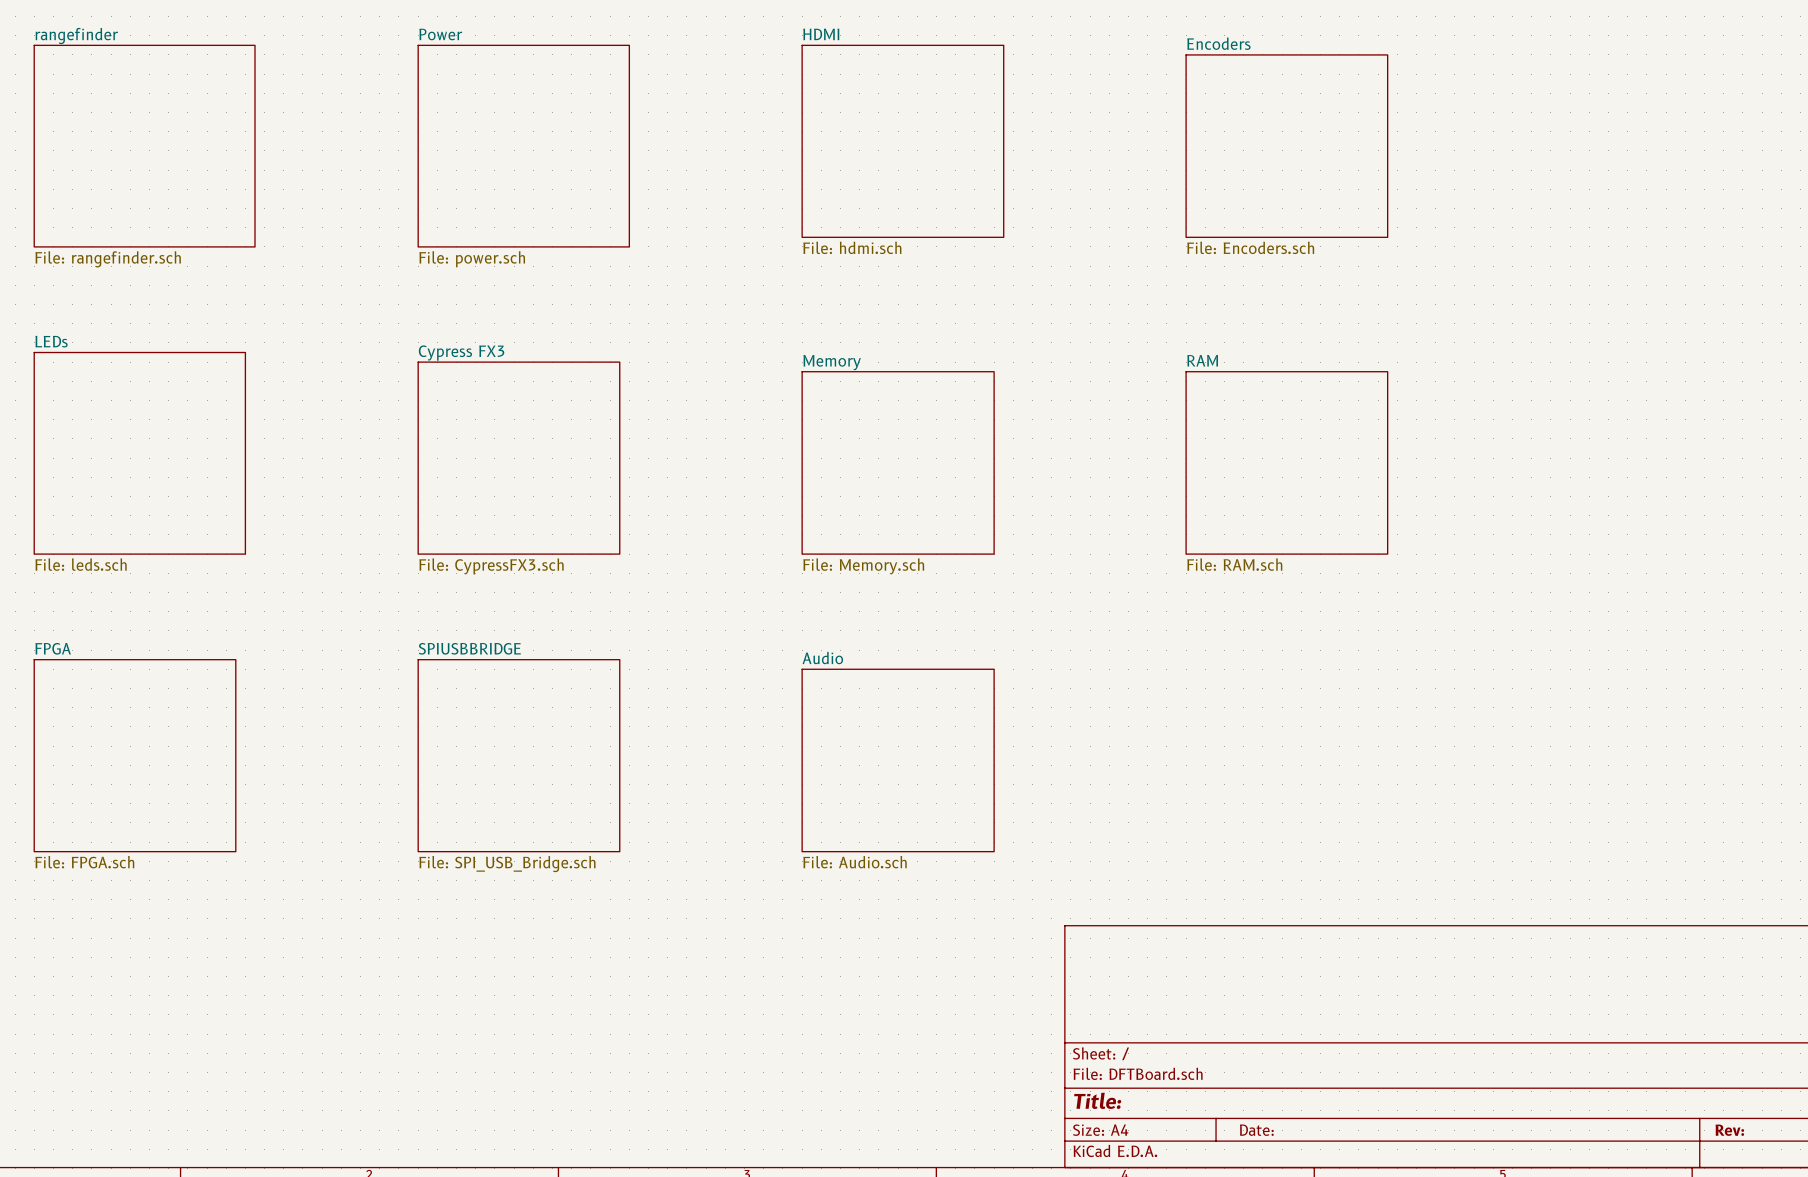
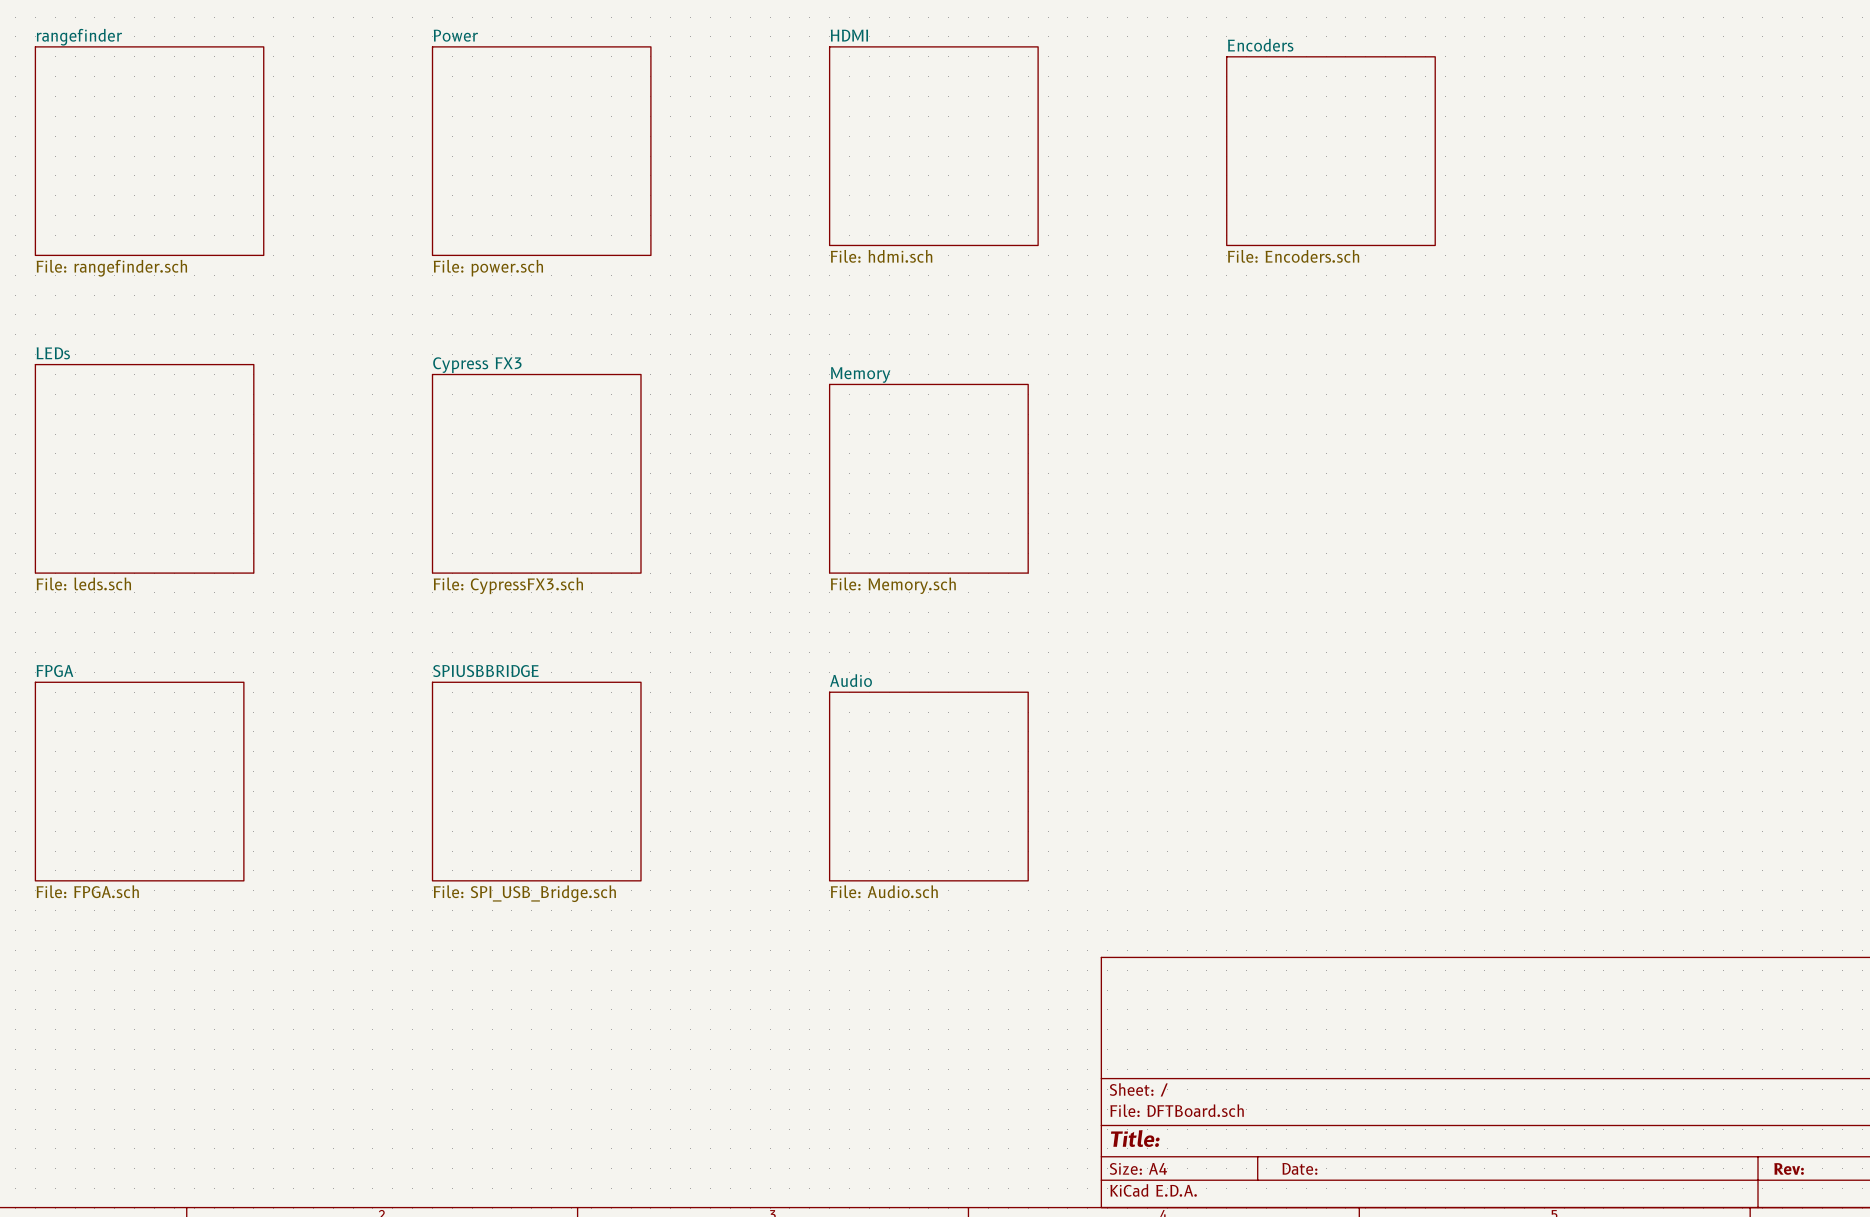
sheet RAM: File: RAM.sch (1286, 462) -> none

